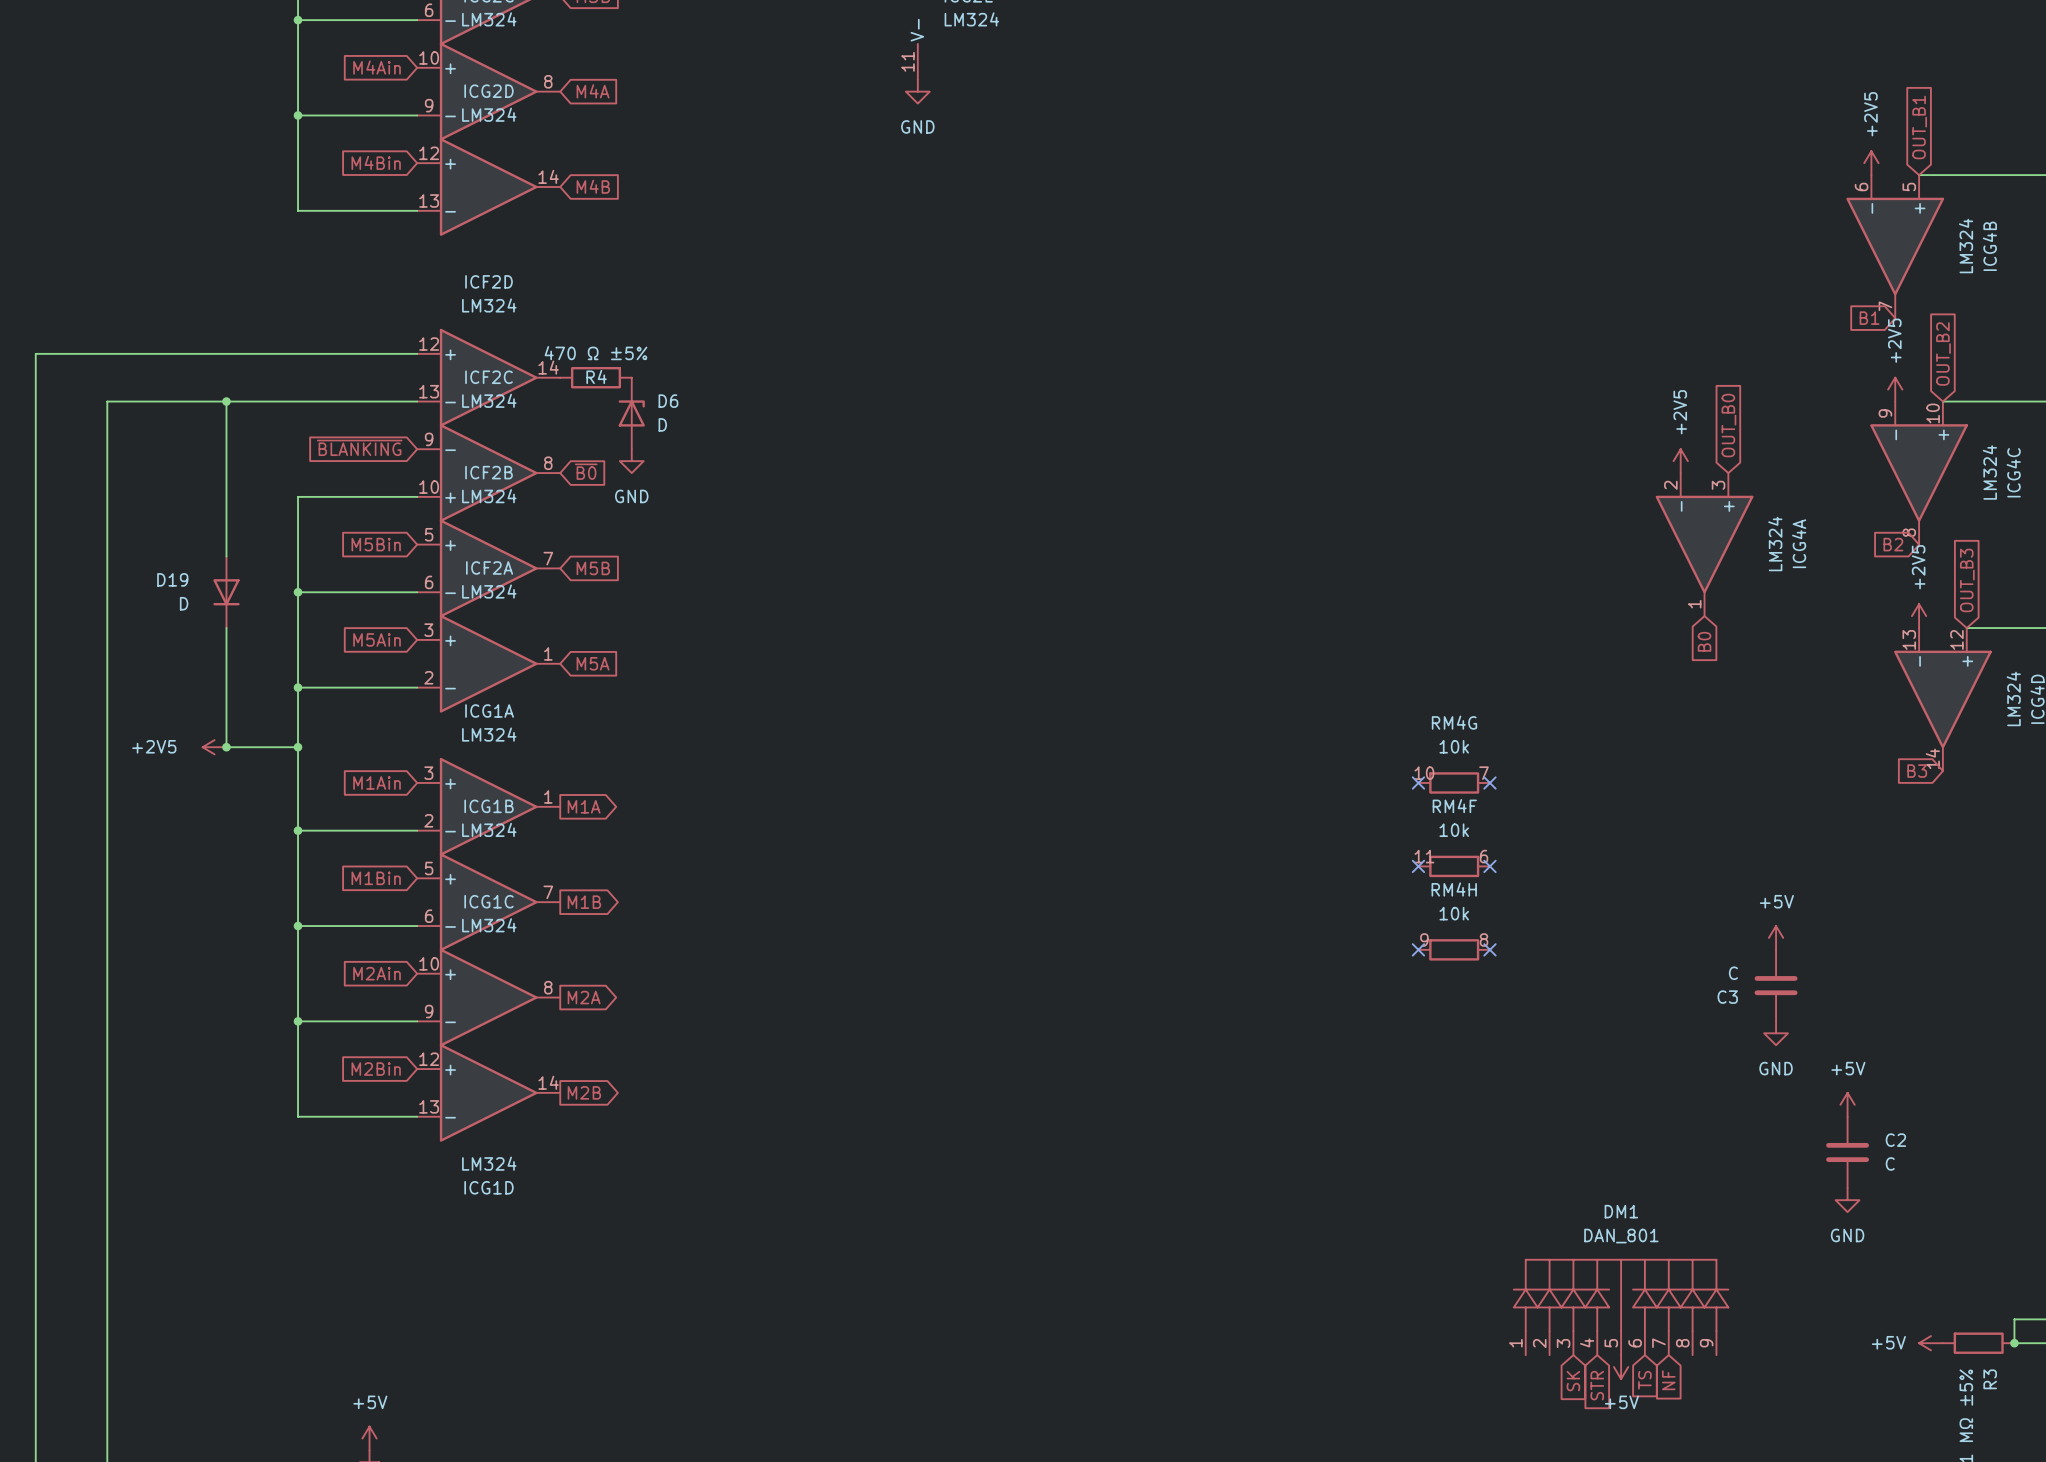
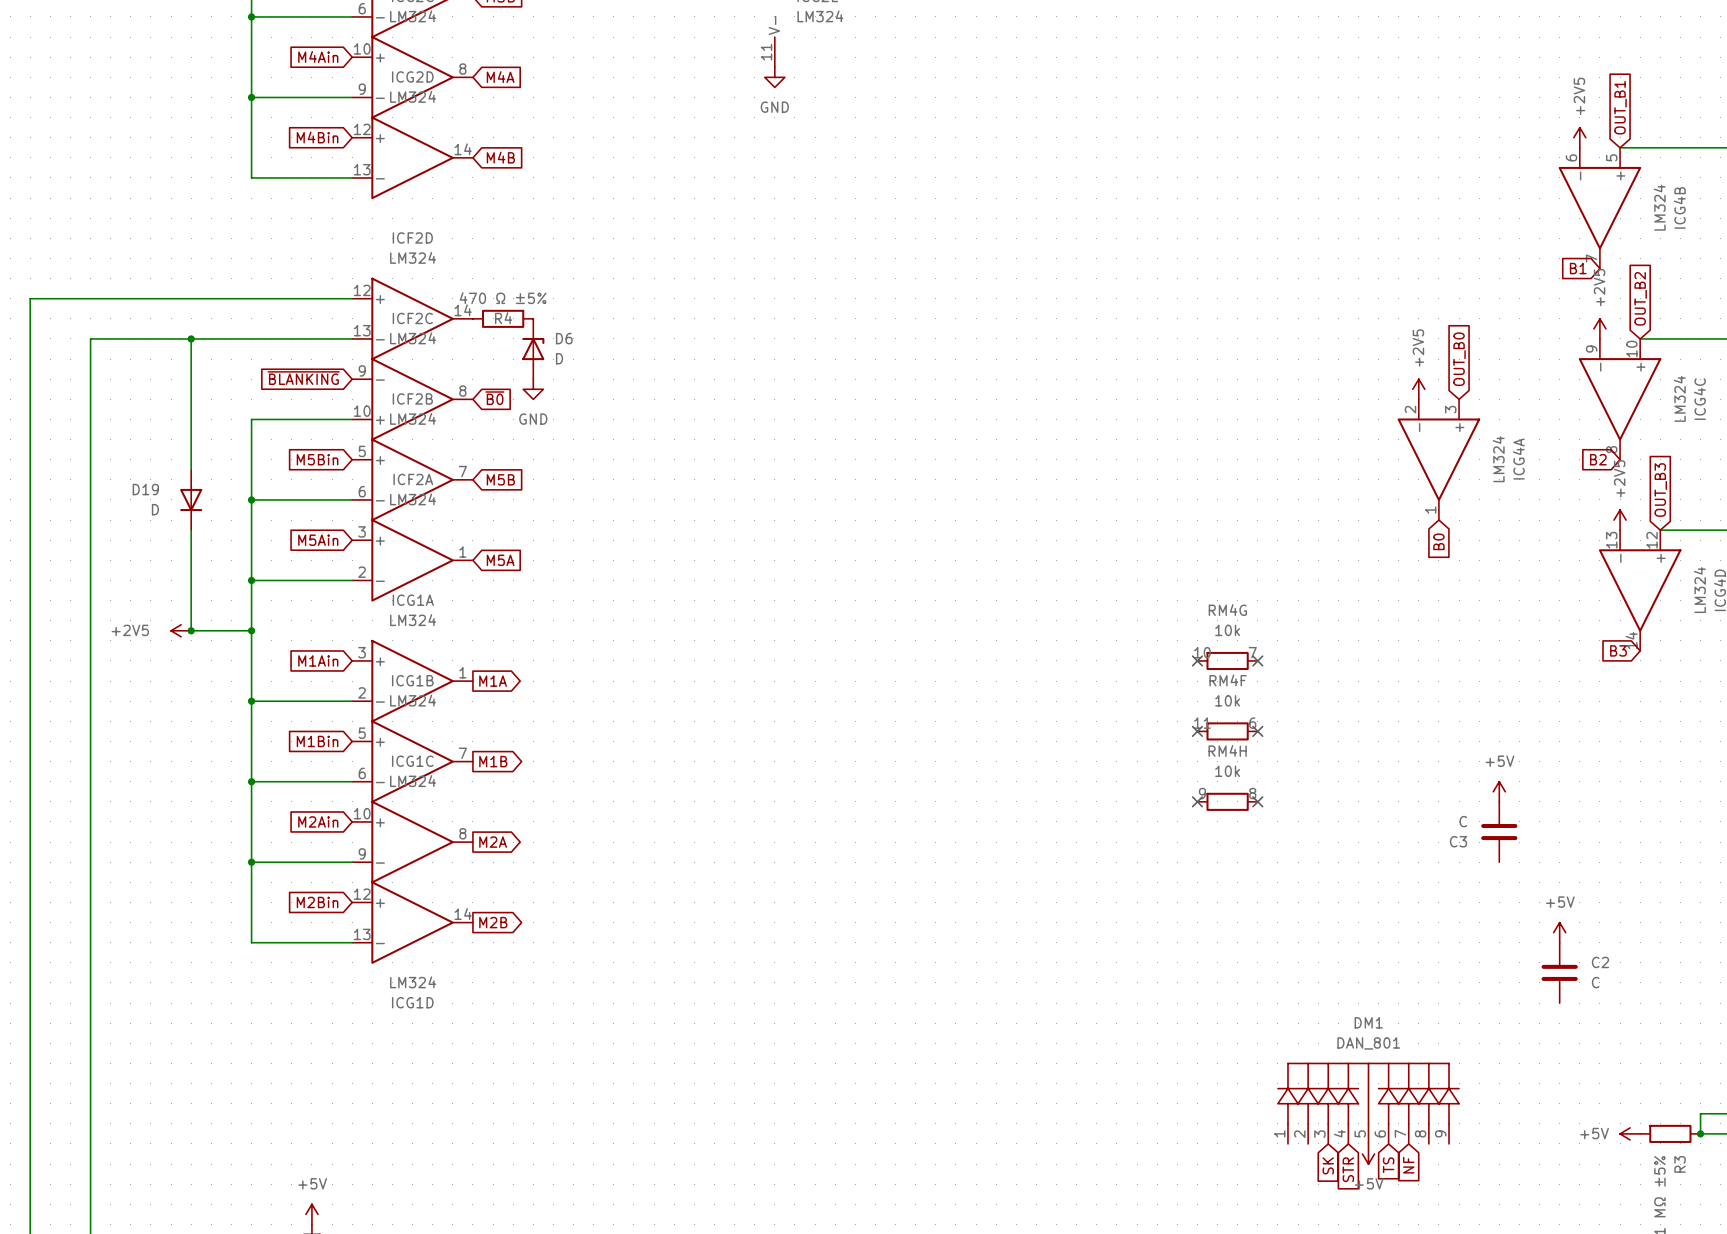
power symbol: GND (1776, 1033) -> none
power symbol: GND (1847, 1200) -> none

